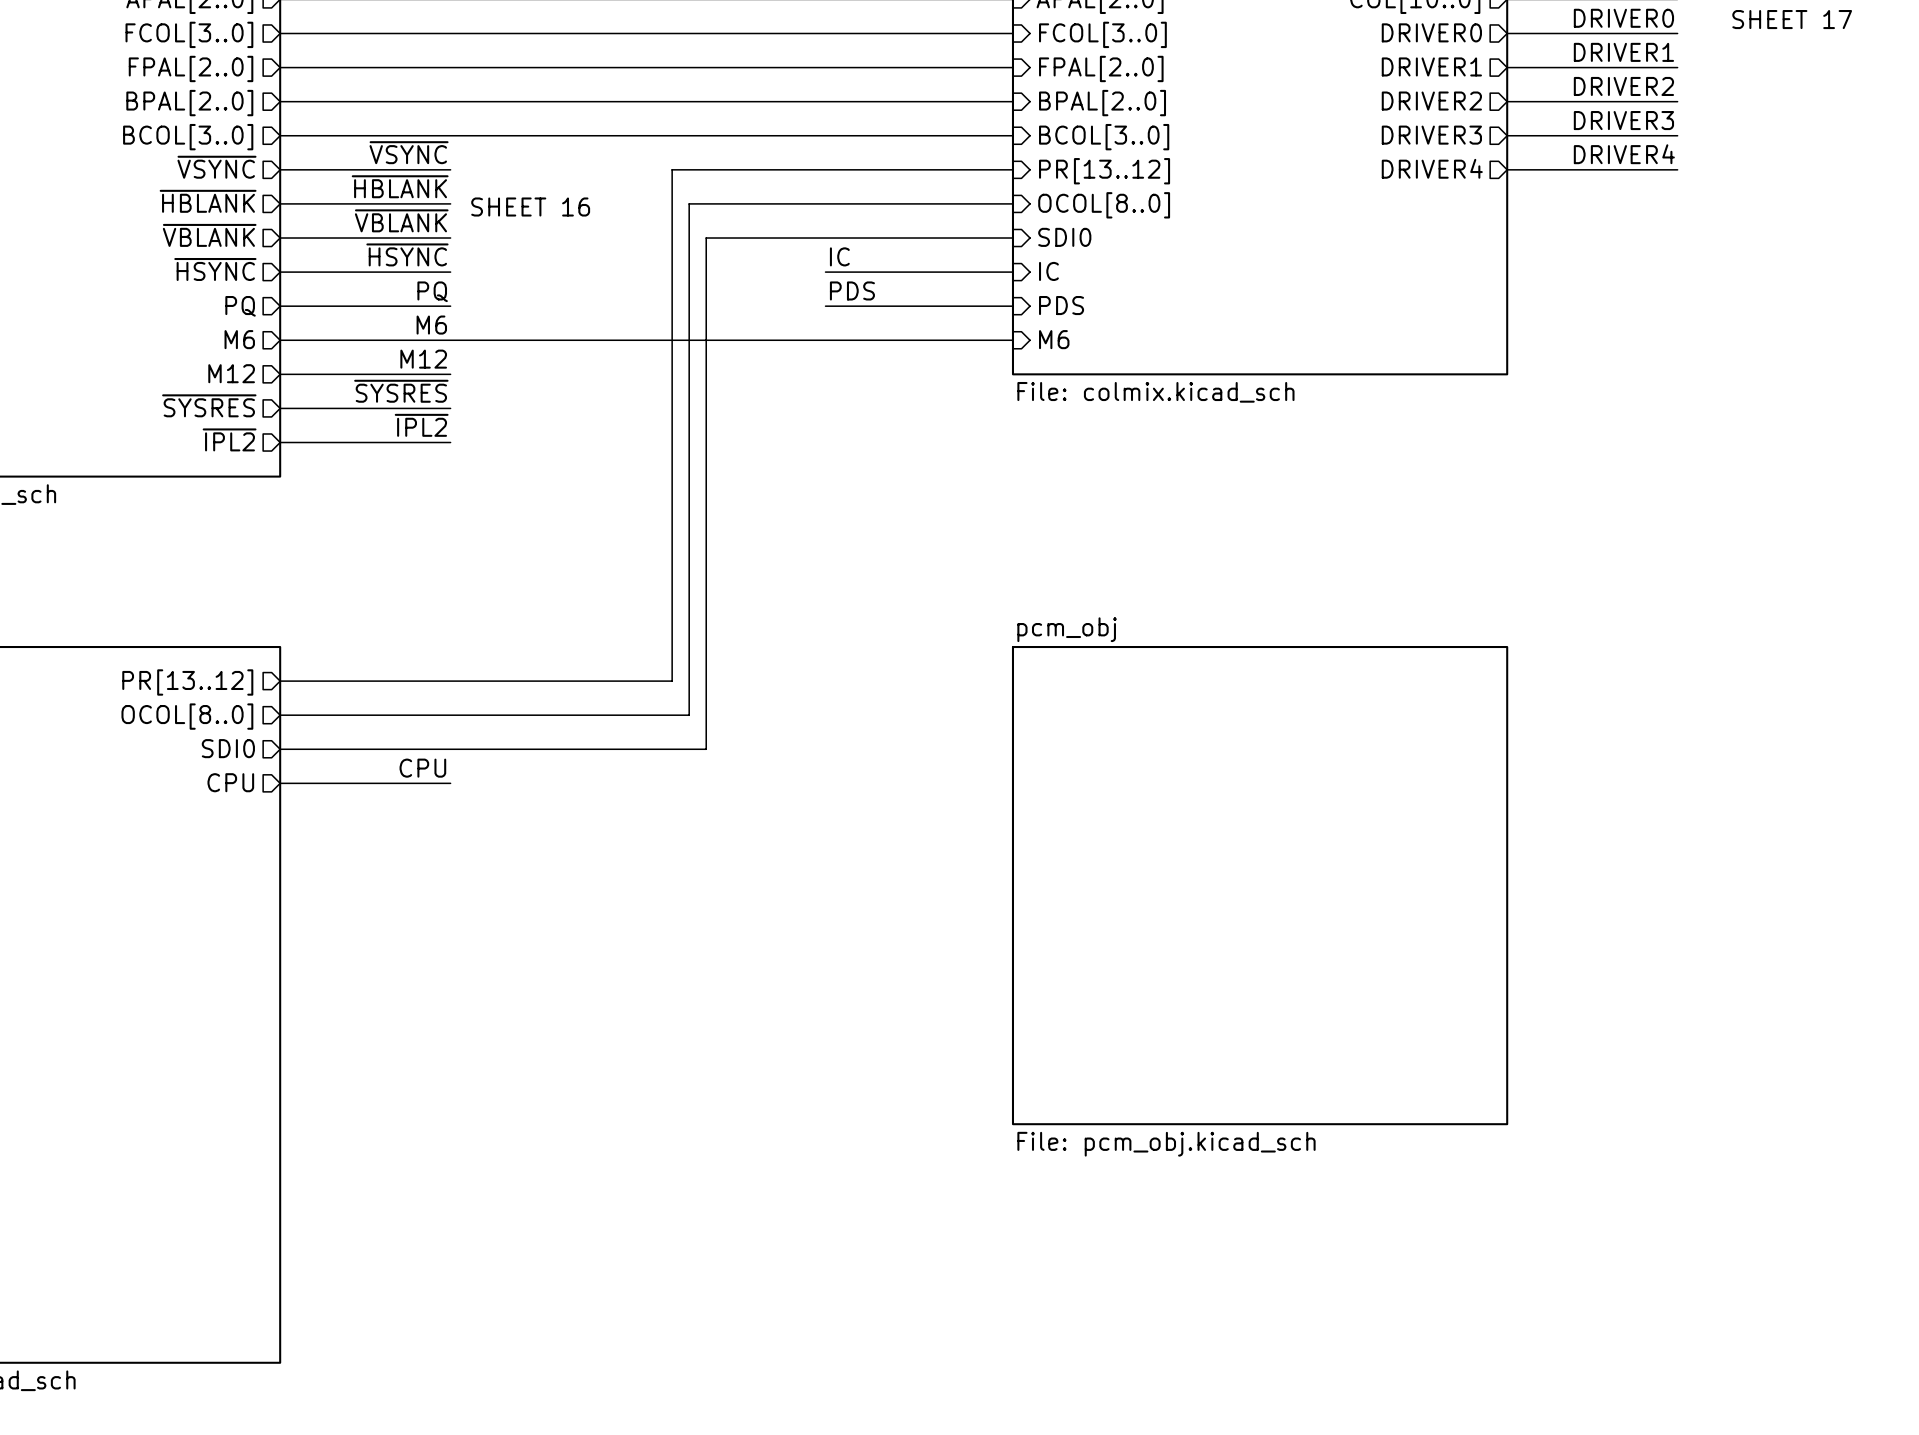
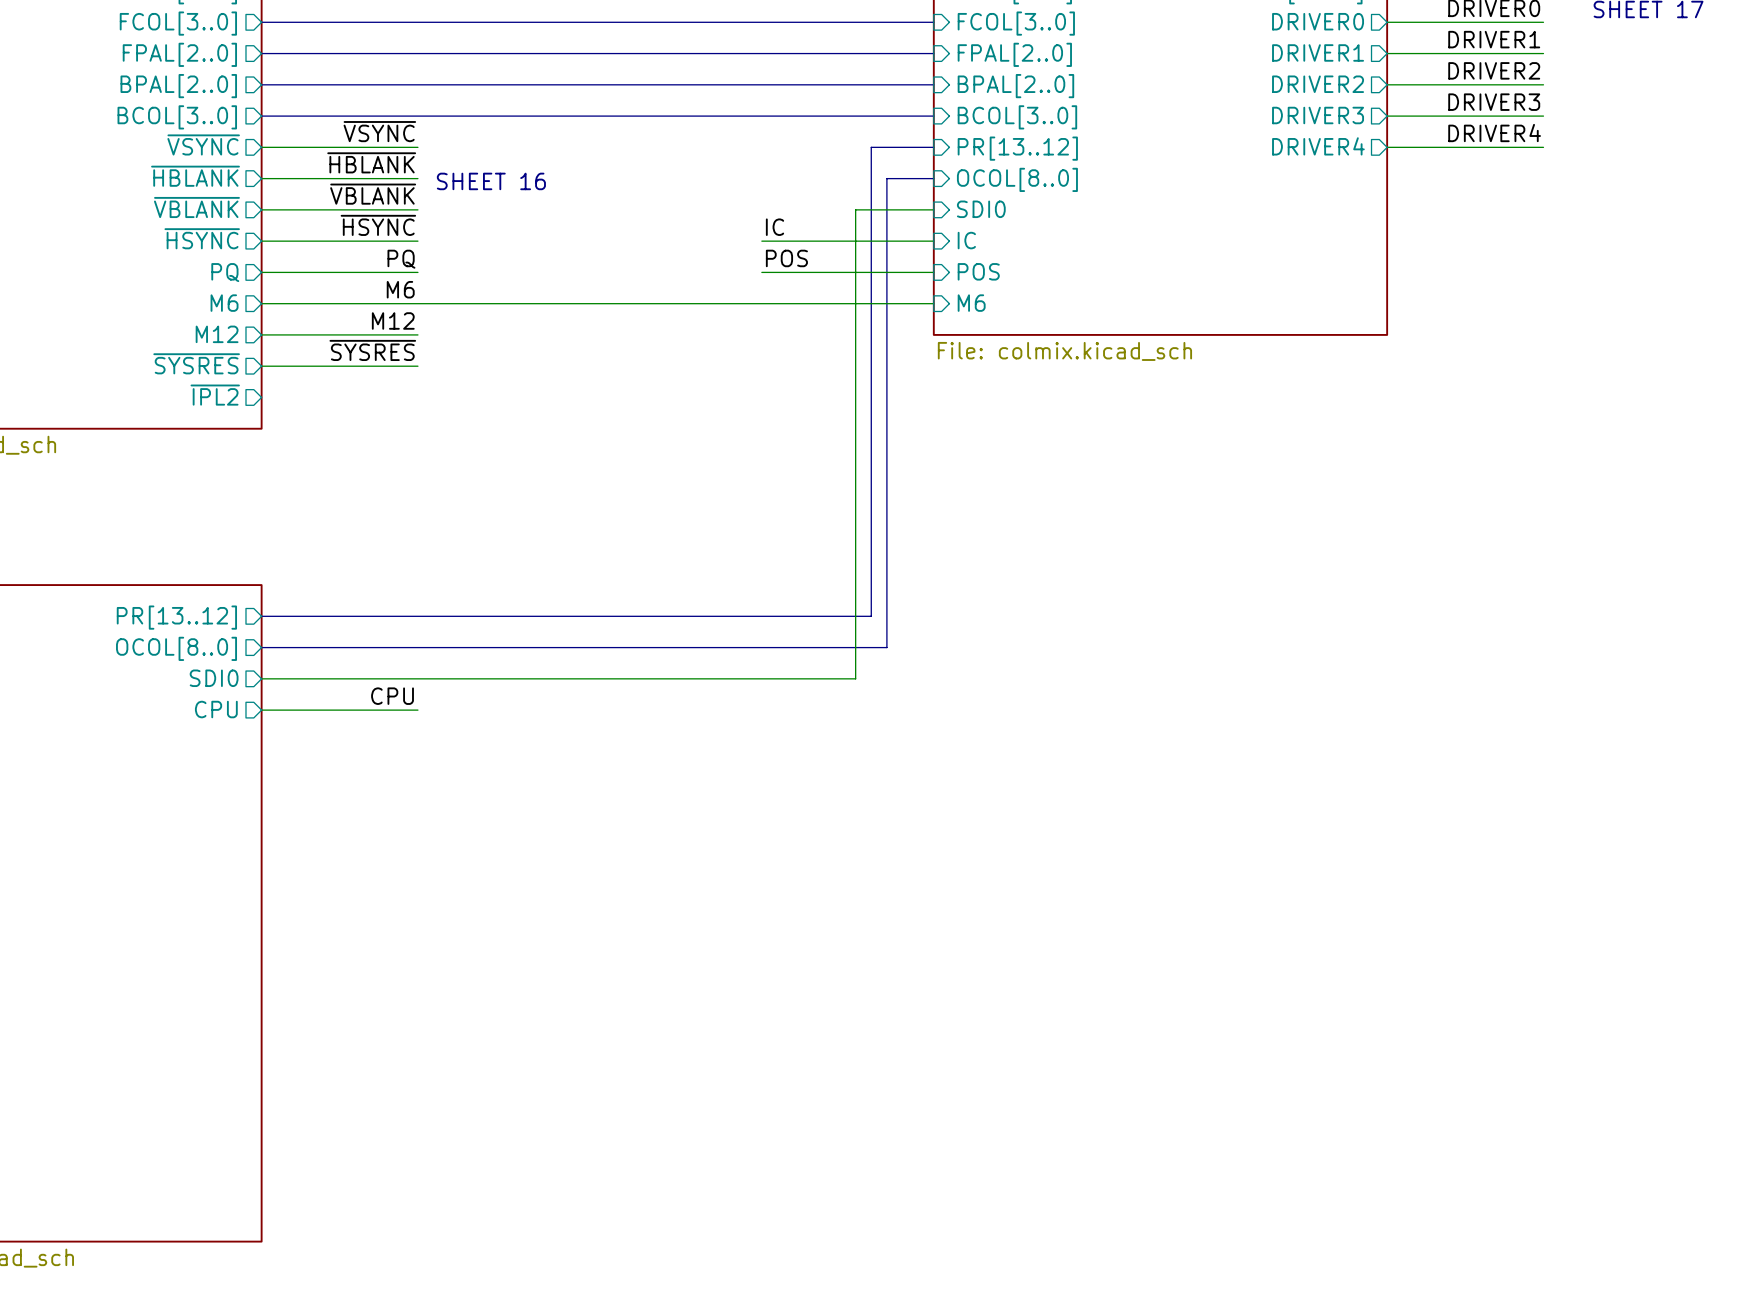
bus: (944, 169) (672, 169) (672, 681) -> (871, 147) (871, 616) (621, 616)
bus: (961, 203) (689, 203) (689, 715) -> (886, 178) (886, 647) (636, 647)
wire: (927, 238) (706, 238) (706, 749) -> (855, 209) (855, 678) (652, 678)
label: PDS (852, 290) -> POS (786, 258)
sheet pin: PDS (1061, 305) -> POS (978, 271)
label: ~{IPL2} (421, 425) -> none
wire: (280, 442) (450, 442) -> none
sheet pcm_obj: File: pcm_obj.kicad_sch (1260, 885) -> none

